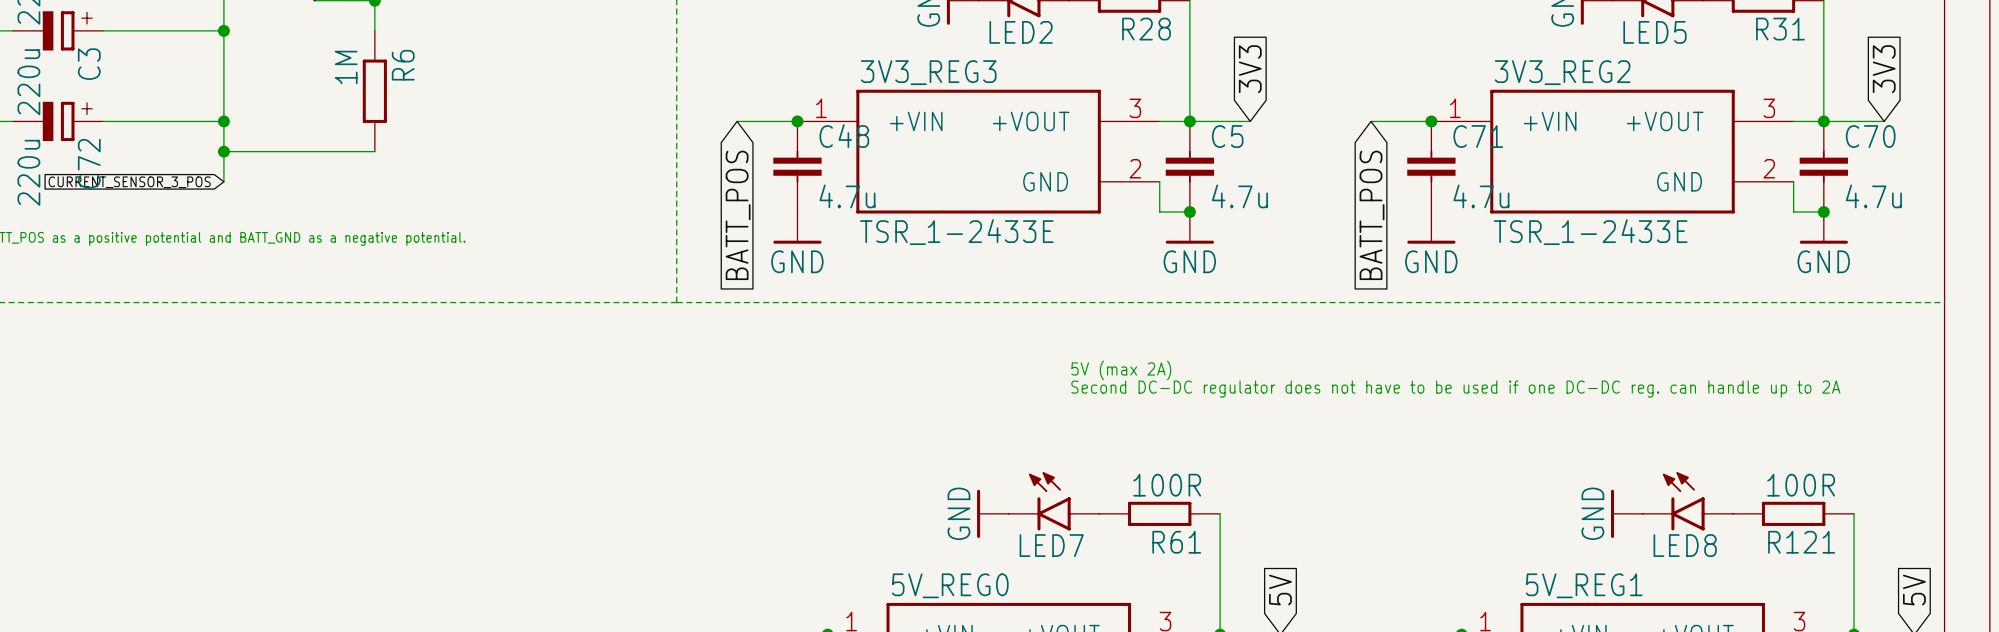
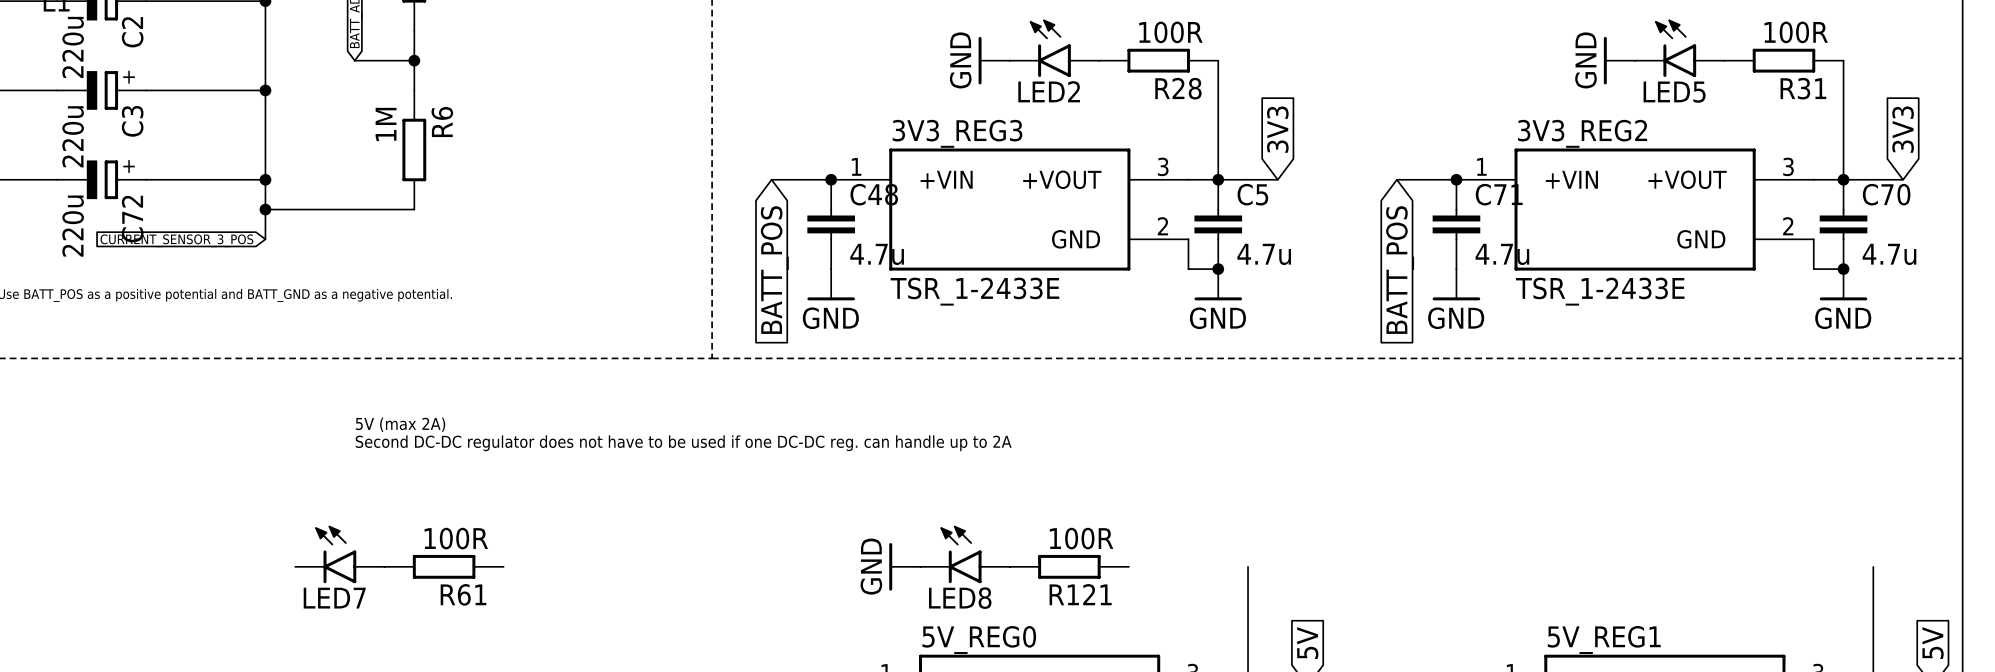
text: none -> 5V (max 2A) (400, 424)
text: 5V (max 2A) (1121, 370) -> none
text: none -> Second DC-DC regulator does not have to be used if one DC-DC reg. can handle up to 2A (683, 443)
text: Second DC-DC regulator does not have to be used if one DC-DC reg. can handle up to 2A (1455, 389) -> none
LED7 position: (1054, 501) -> (339, 554)
LED8 position: (1687, 501) -> (965, 554)
power symbol: none -> GND (904, 566)
power symbol: GND (992, 513) -> none
R61 position: (1159, 513) -> (444, 566)
power symbol: GND (1626, 513) -> none
R121 position: (1793, 513) -> (1069, 566)

